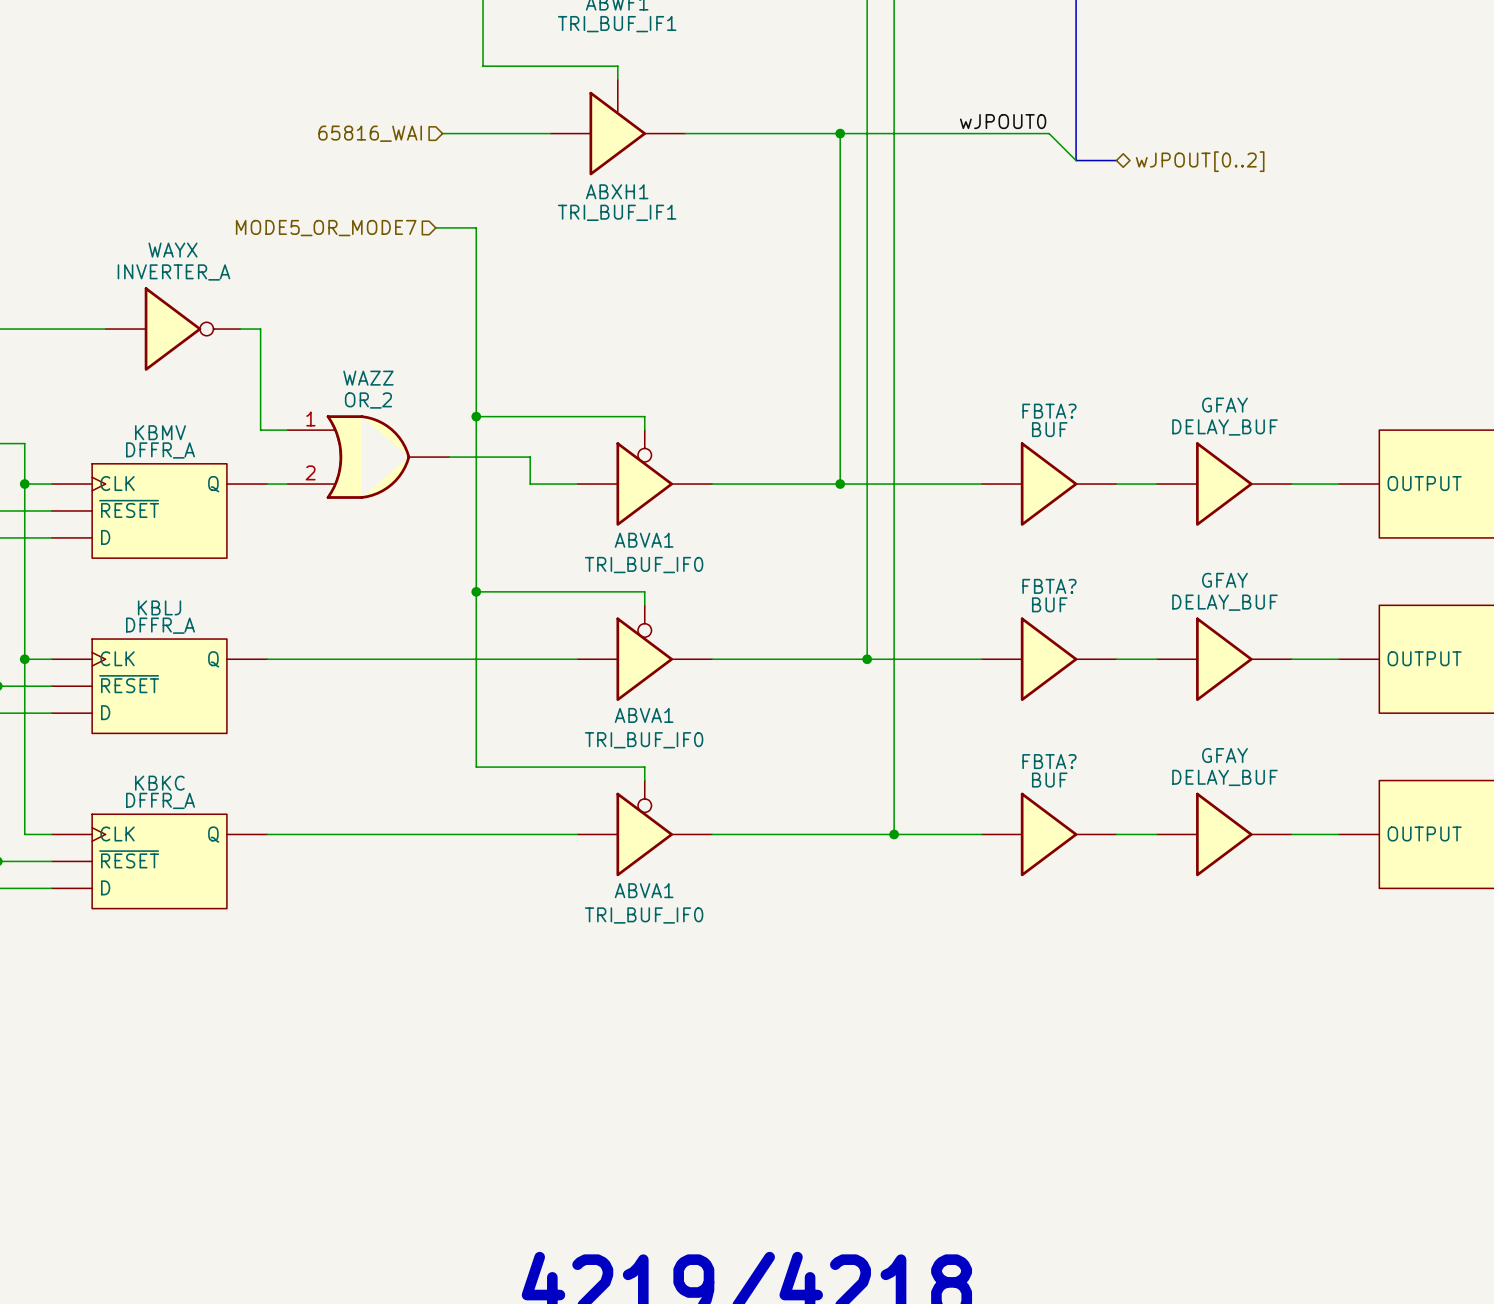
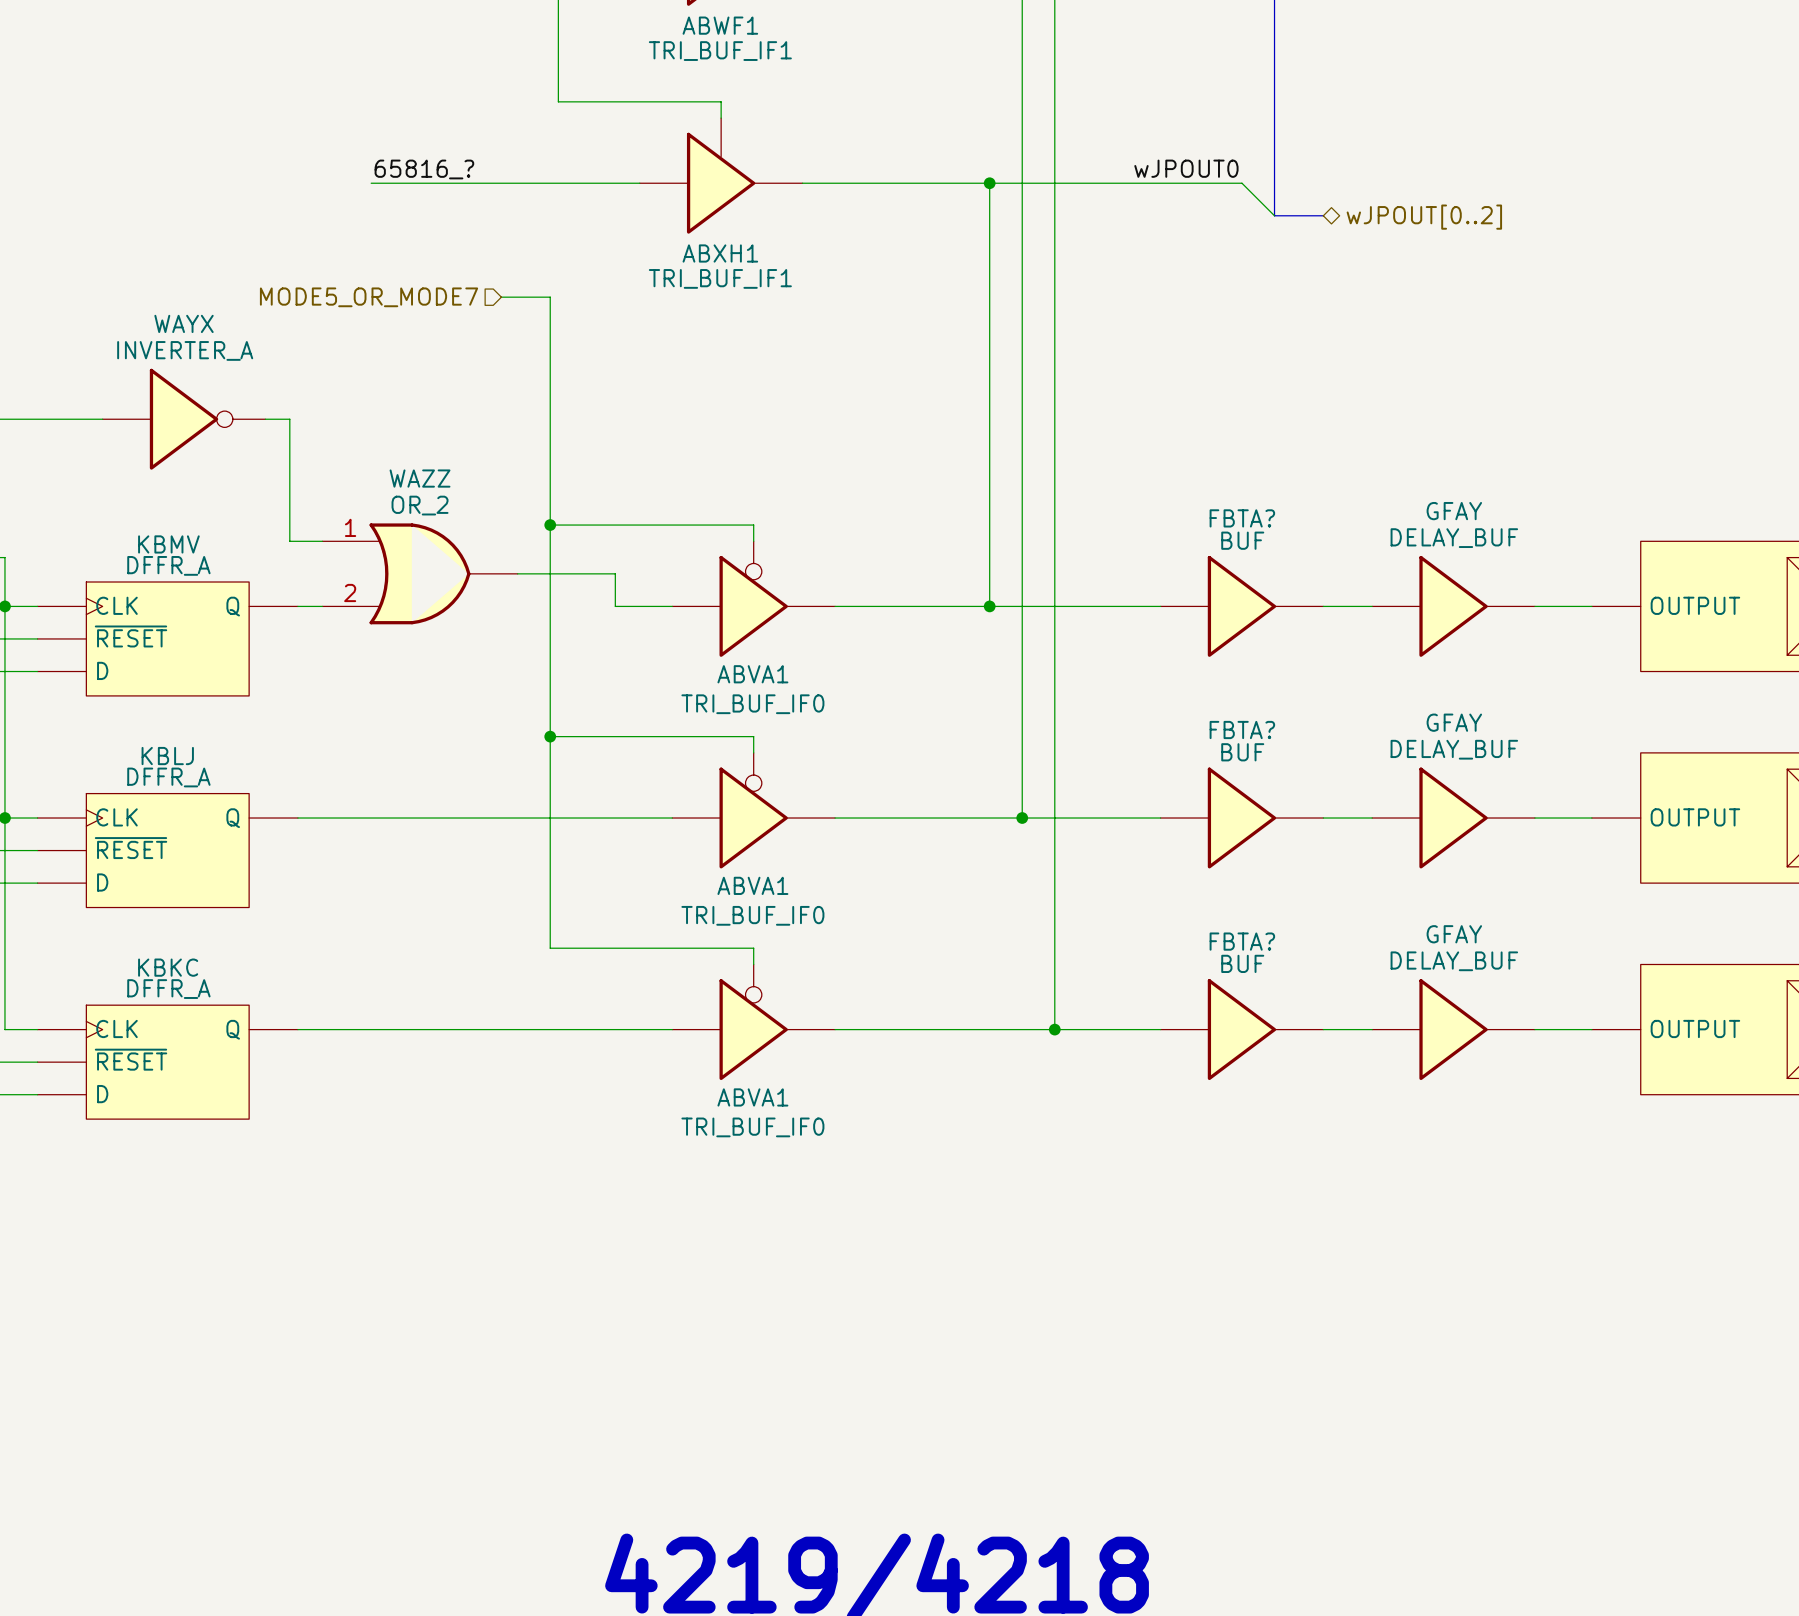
label: none -> 65816_? (424, 169)
wire: none -> (371, 183) (509, 183)
hierarchical label: 65816_WAI (370, 133) -> none

